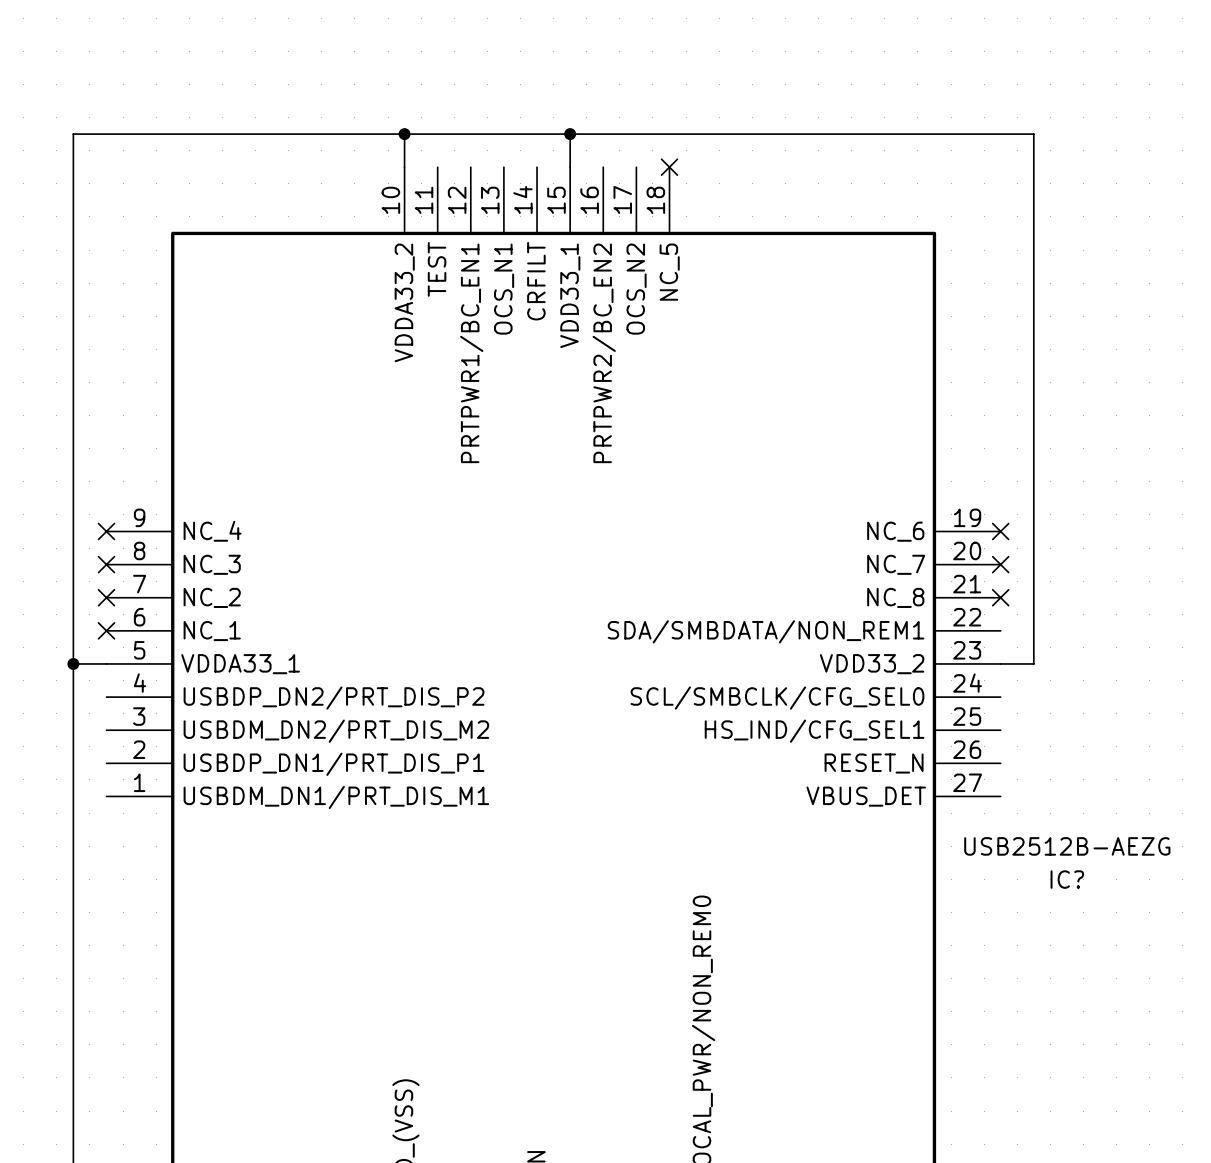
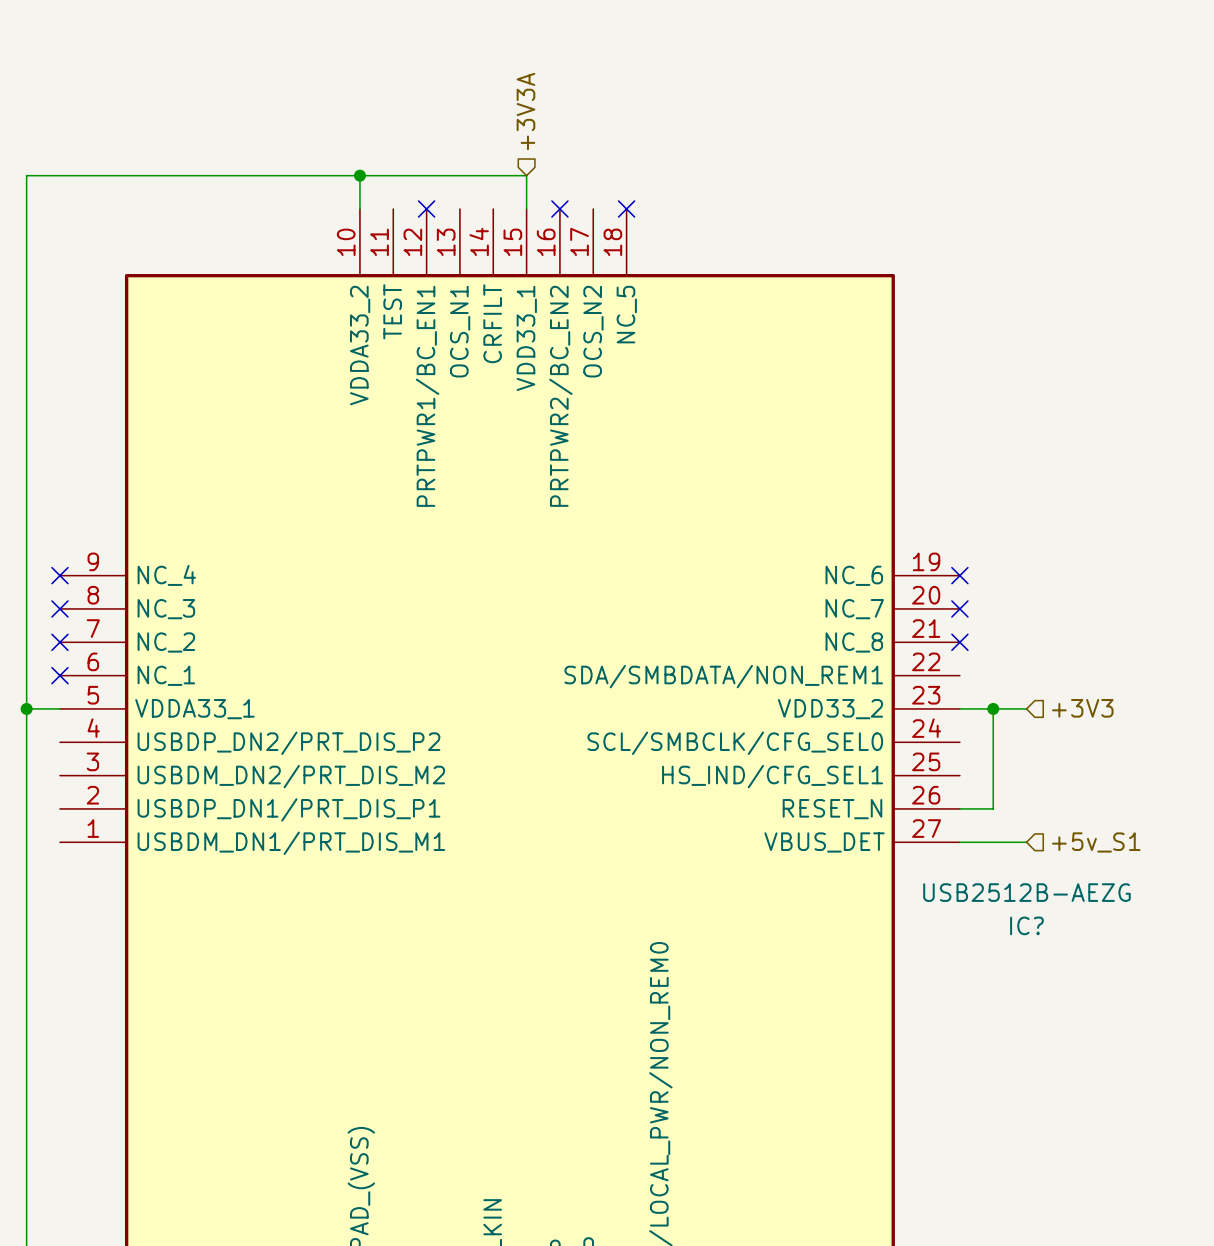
hierarchical label: none -> +3V3A (525, 111)
wire: (570, 134) (1033, 134) (1033, 663) -> none
junction: (570, 134) -> none
no-connect mark: none -> (426, 209)
no-connect mark: none -> (559, 209)
junction: none -> (993, 708)
wire: none -> (1026, 708) (993, 708) (993, 808) (959, 808)
hierarchical label: none -> +3V3 (1082, 708)
wire: none -> (959, 842) (1026, 842)
hierarchical label: none -> +5v_S1 (1096, 842)

